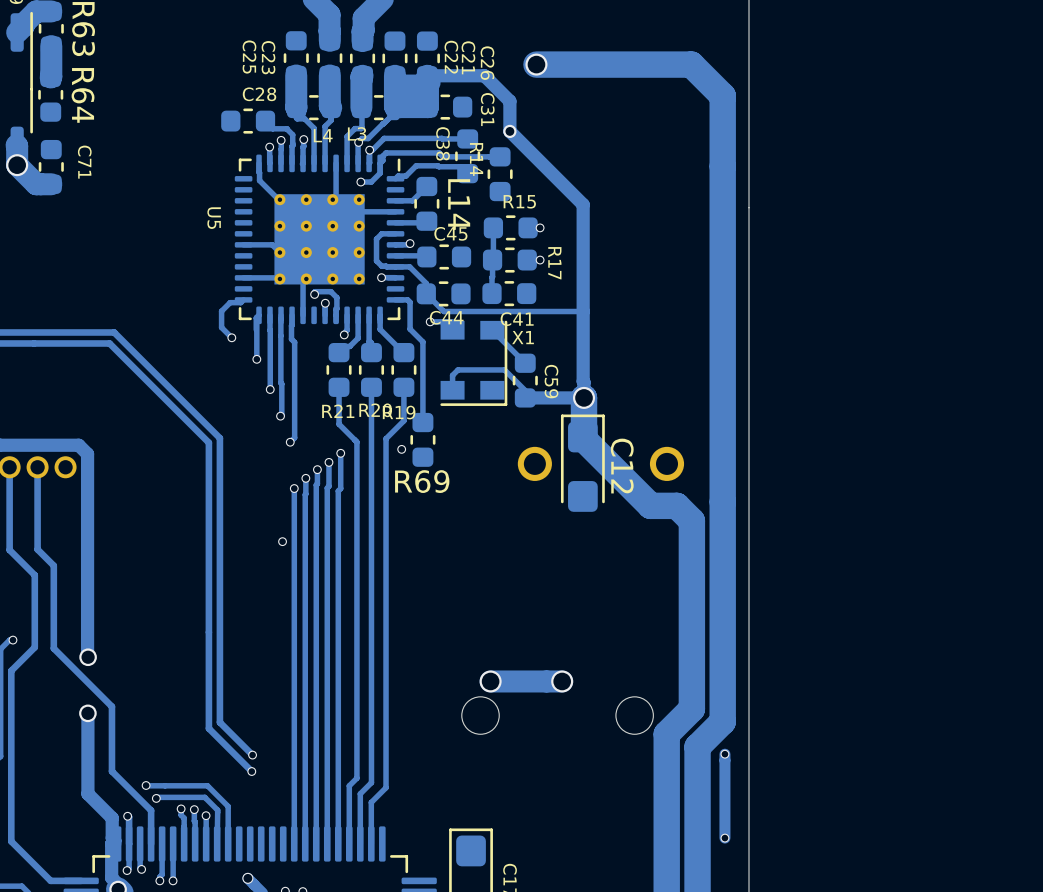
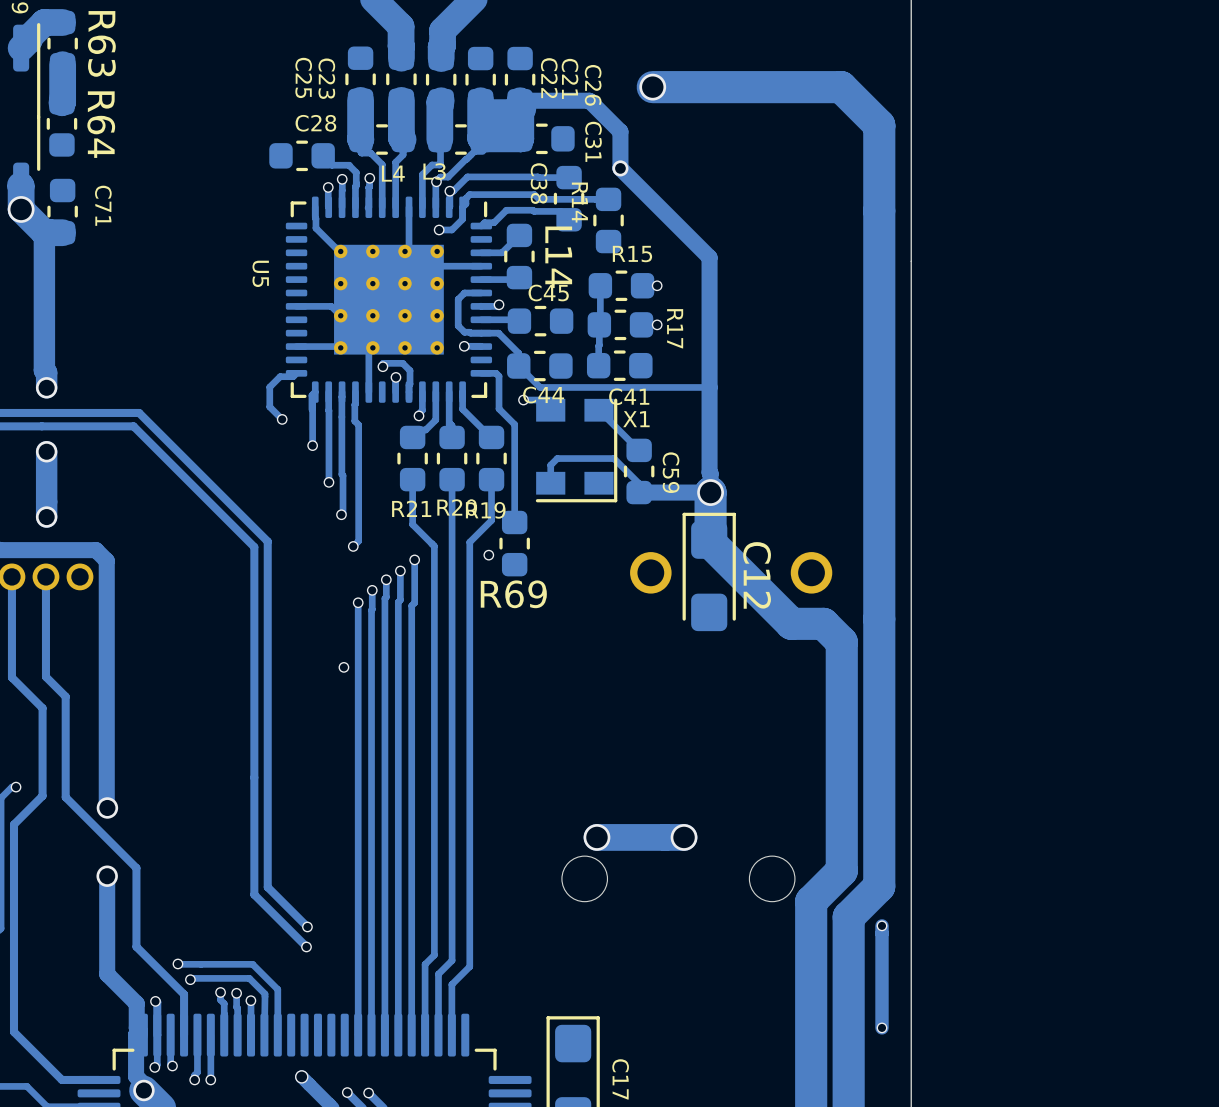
track: none -> (44, 232) (44, 370) (46, 372) (46, 387)
via: none -> (46, 387)
track: none -> (46, 451) (46, 517)
via: none -> (46, 451)
via: none -> (46, 517)

